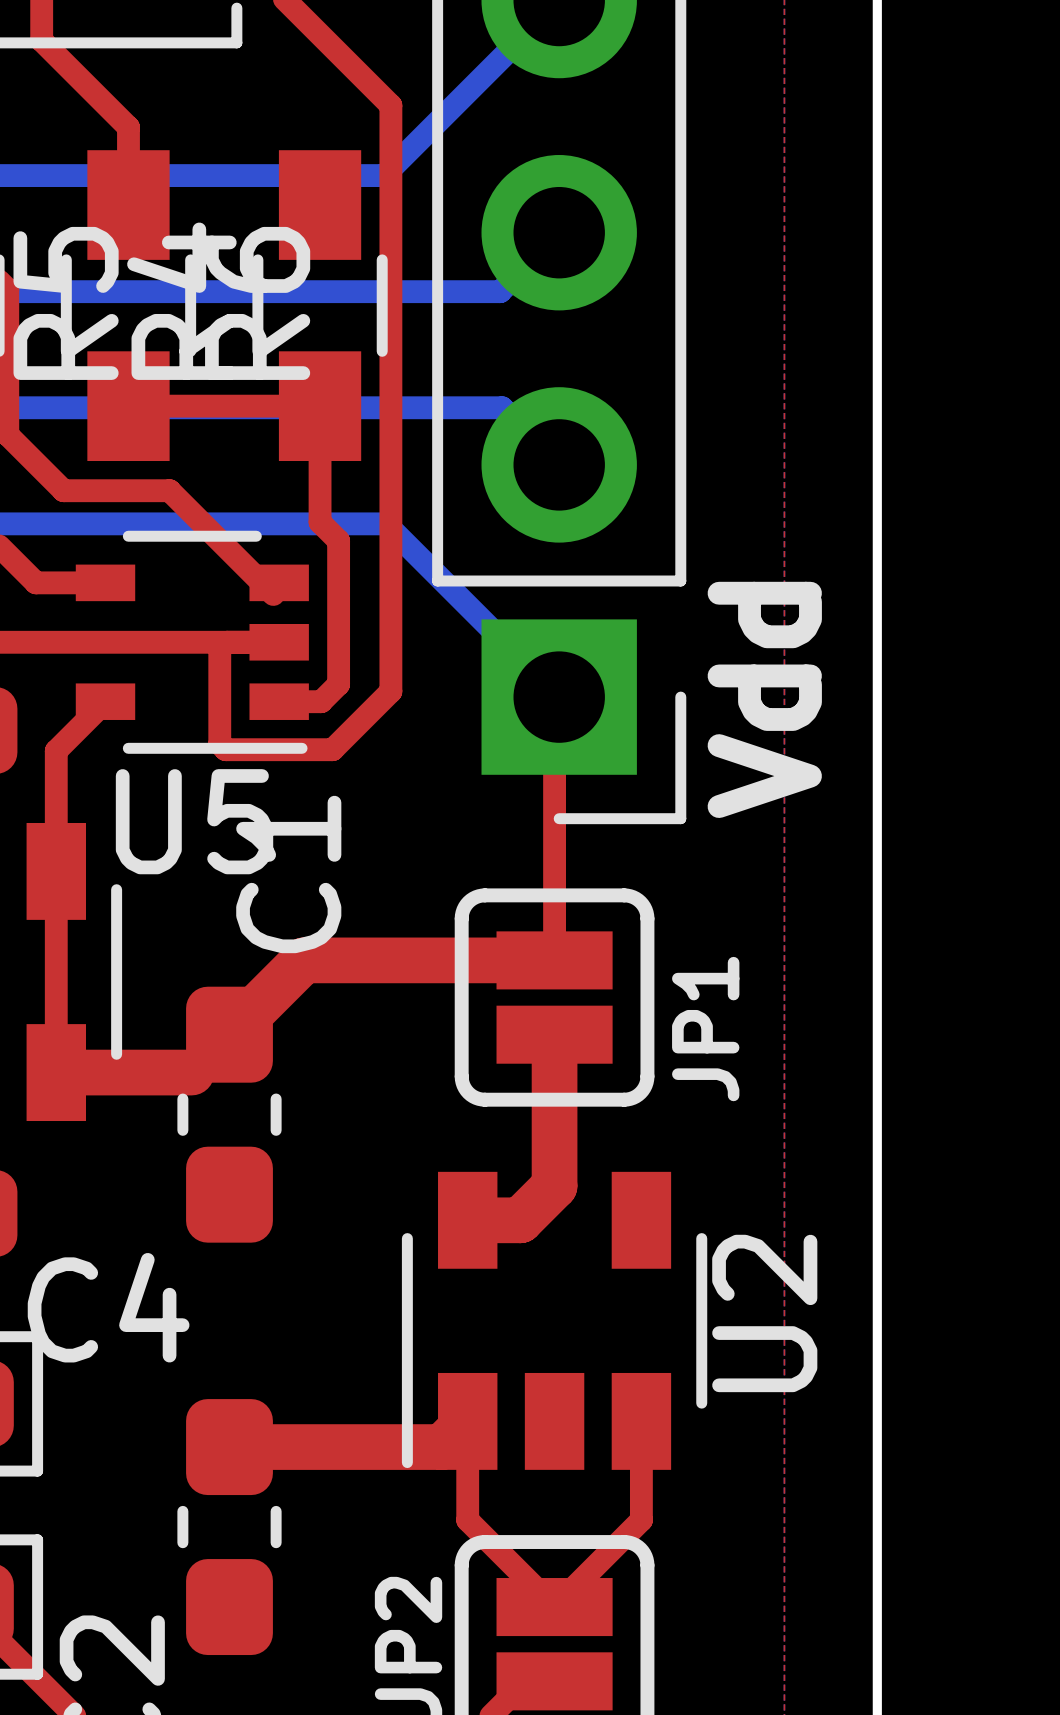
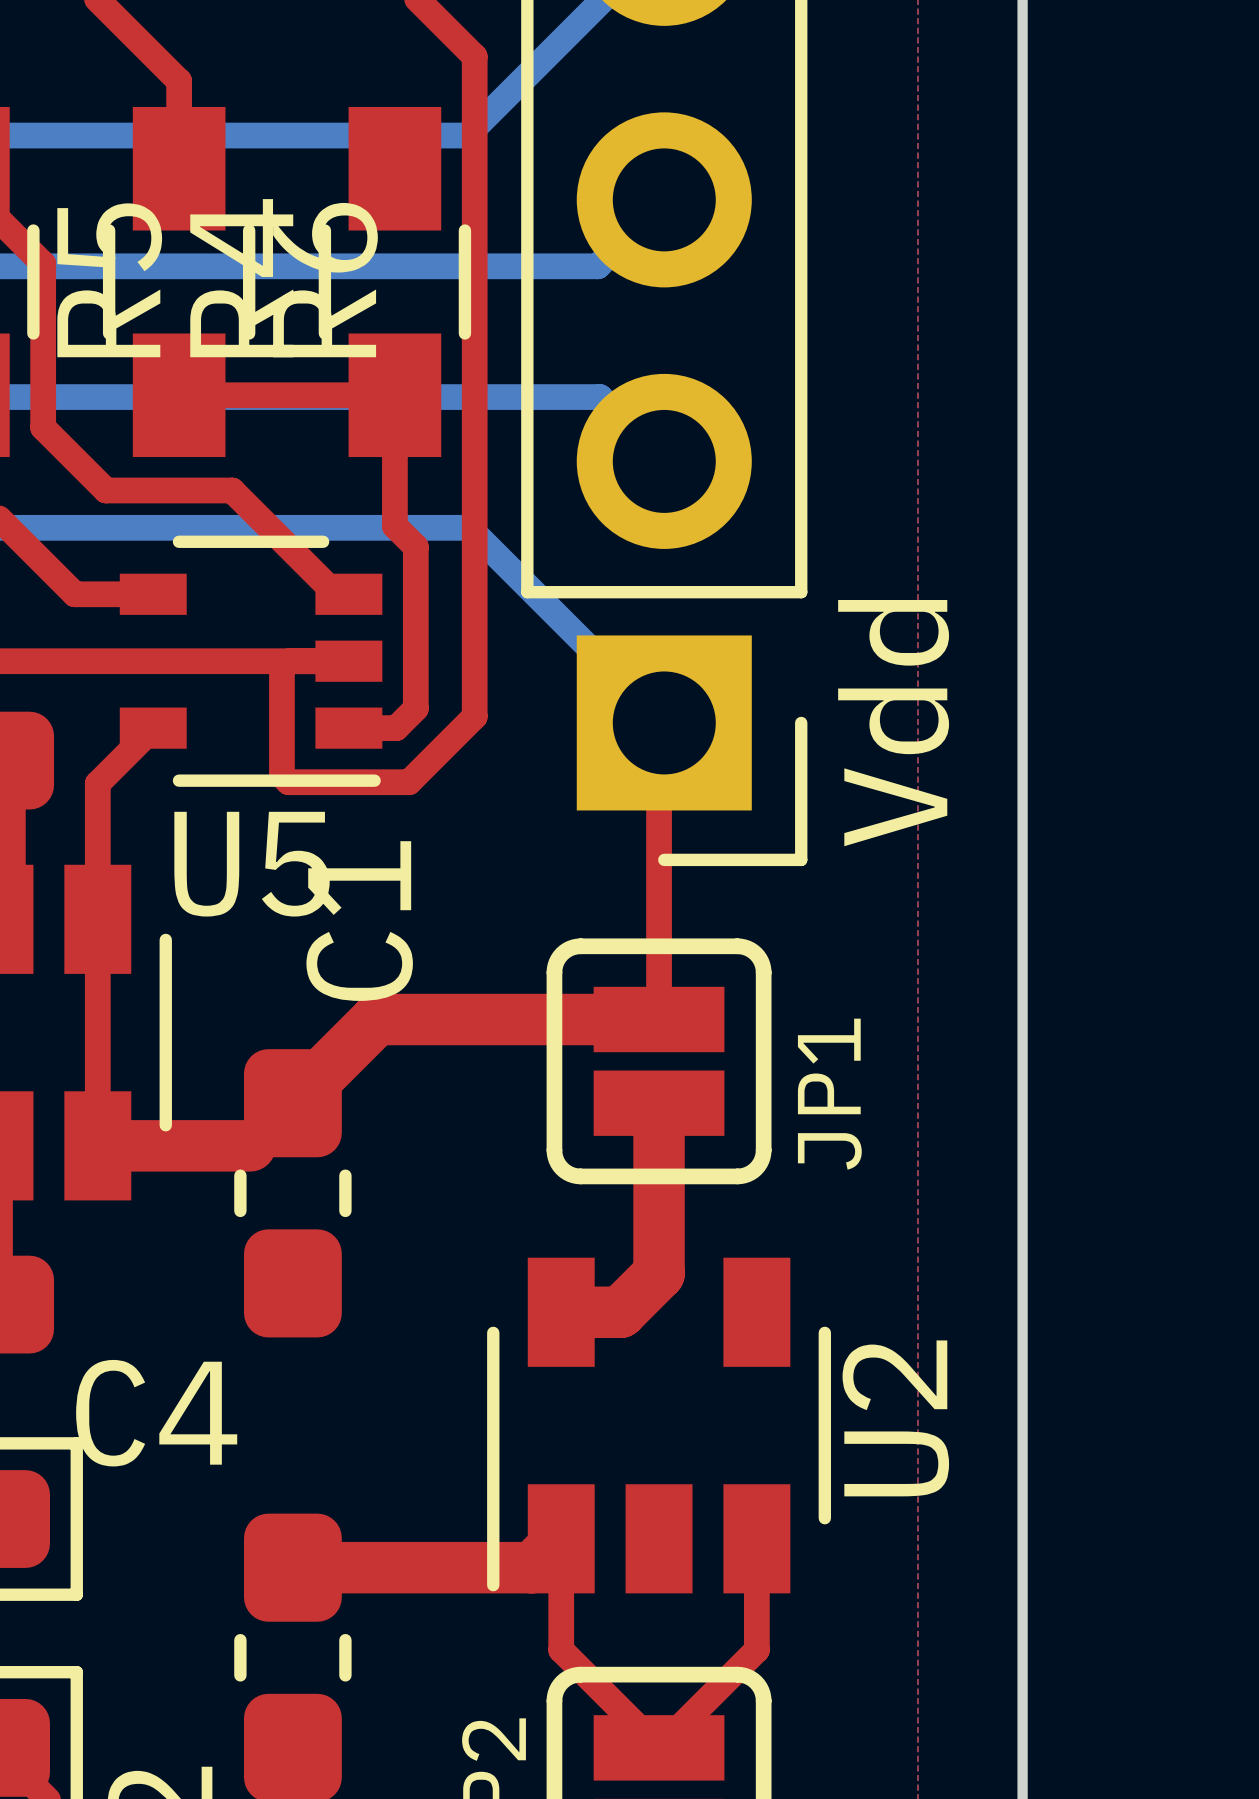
top track: (169, 490) (273, 594) -> (225, 490) (232, 490) (336, 594) (348, 594)

